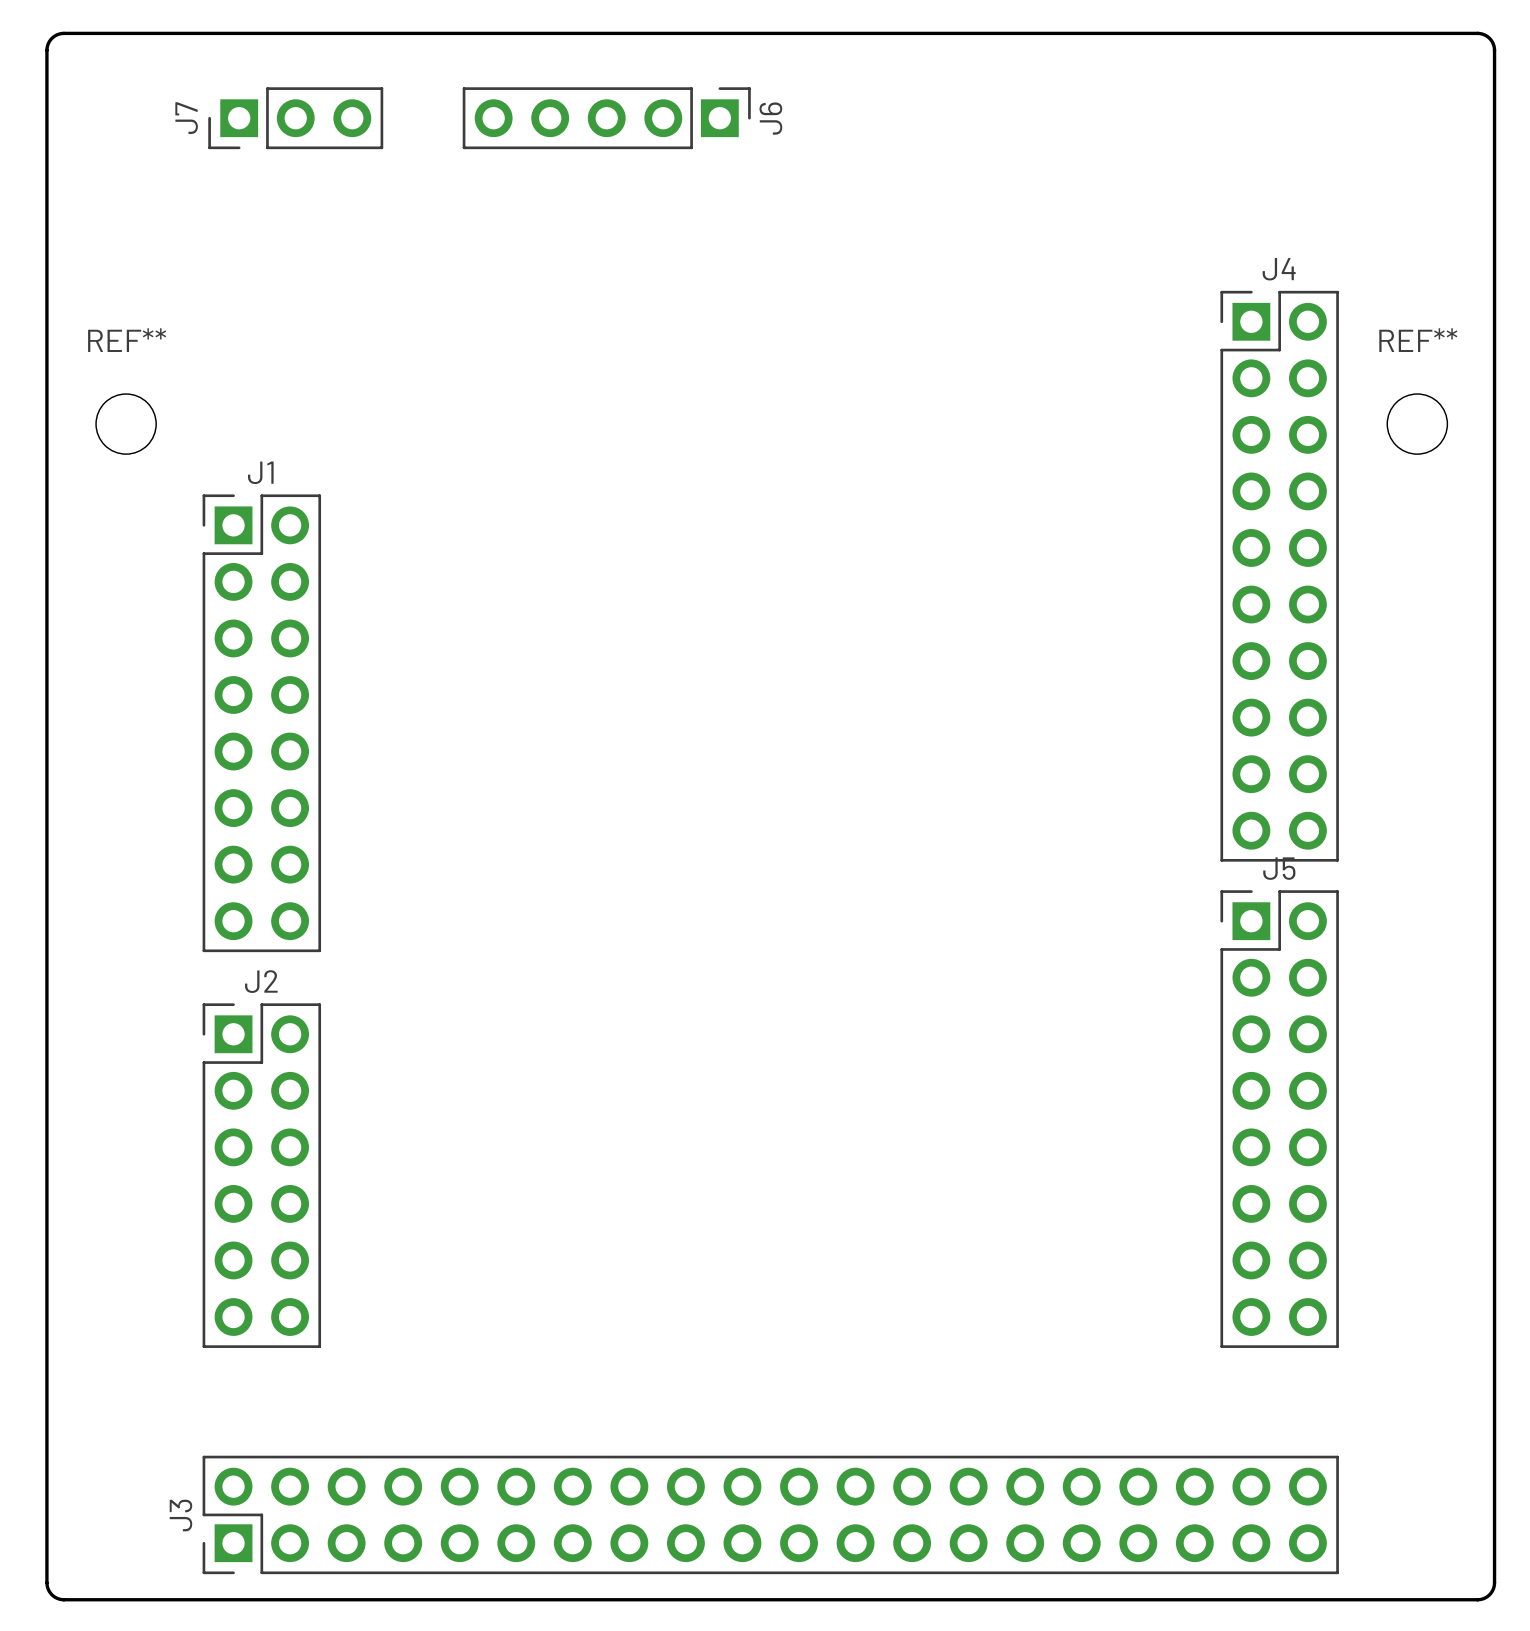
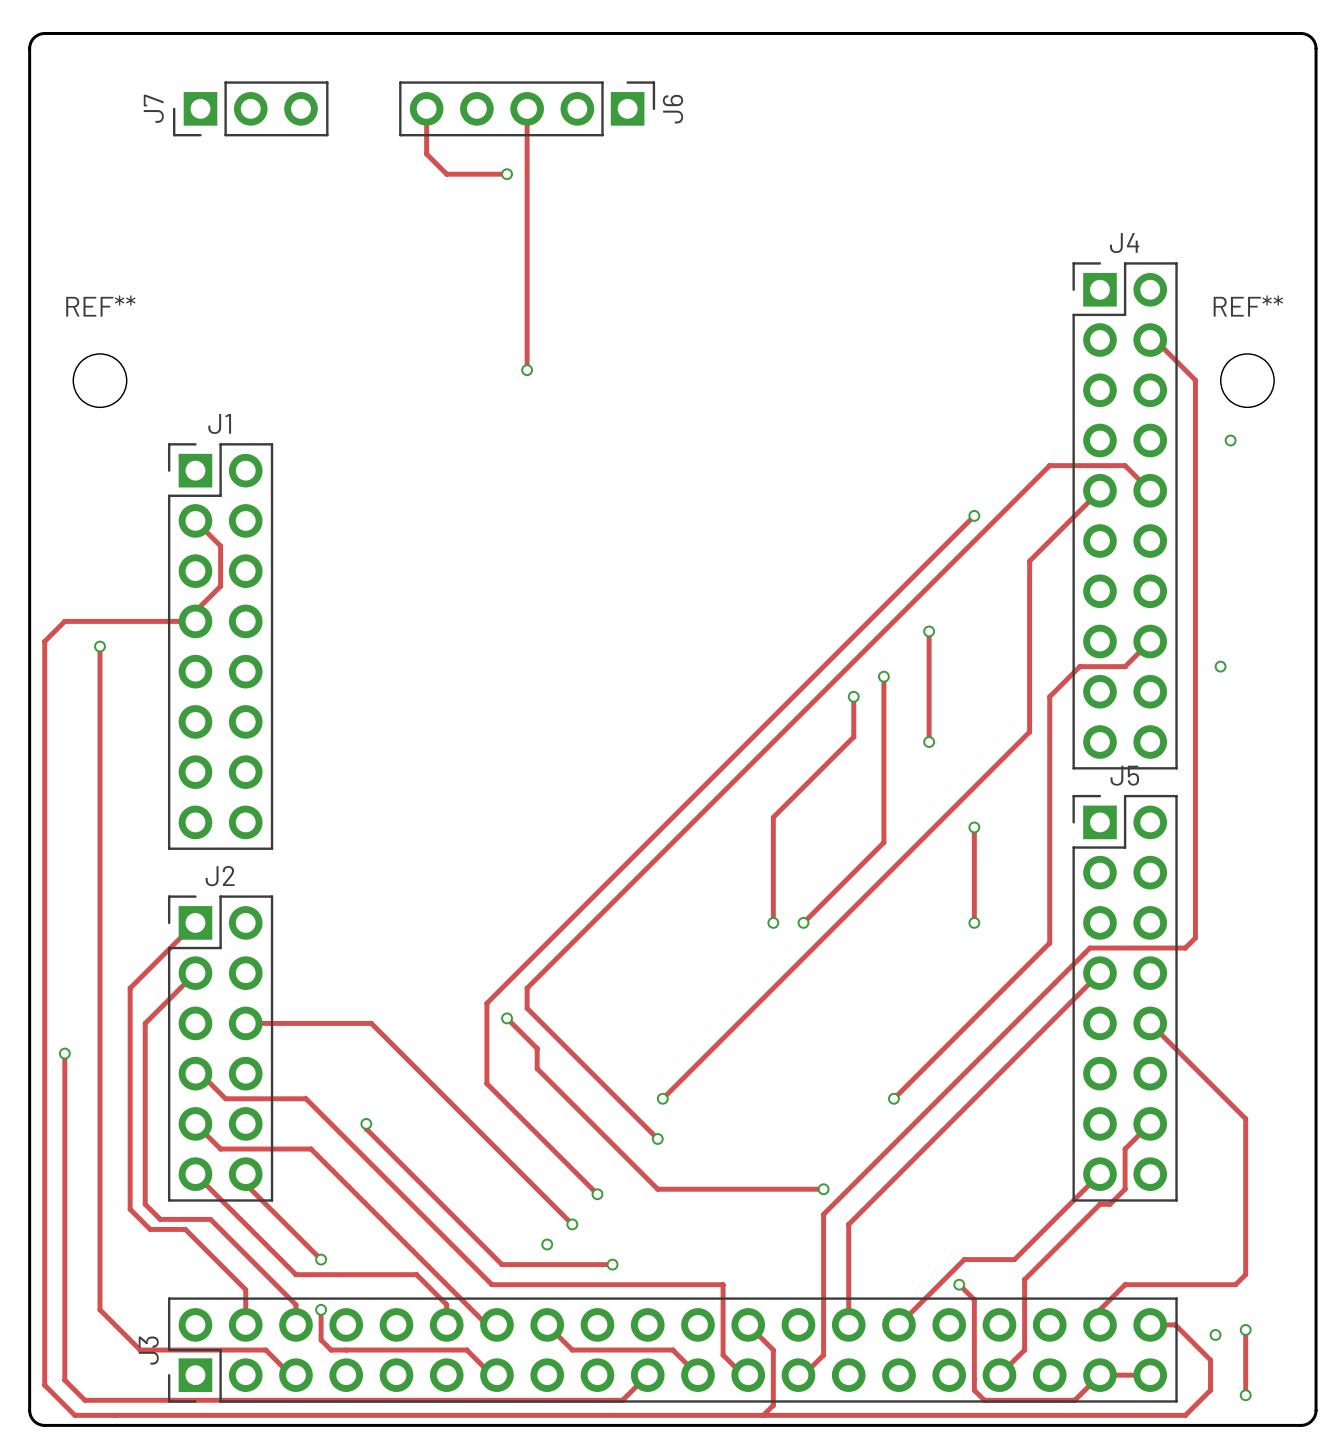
track: none -> (426, 108) (426, 154) (446, 174) (507, 174)
track: none -> (527, 108) (527, 370)
via: none -> (507, 174)
track: none -> (1150, 340) (1155, 340) (1195, 380) (1195, 937) (1185, 948) (1089, 948) (823, 1214) (823, 1355) (803, 1375) (798, 1375)
via: none -> (527, 370)
via: none -> (1230, 440)
track: none -> (1099, 490) (1029, 561) (1029, 731) (662, 1098)
track: none -> (1150, 490) (1125, 465) (1049, 465) (527, 988) (527, 1008) (657, 1138)
track: none -> (974, 515) (486, 1003) (486, 1083) (597, 1194)
via: none -> (974, 515)
track: none -> (195, 520) (220, 546) (220, 586) (195, 611) (195, 621) (64, 621) (44, 641) (44, 1385) (74, 1415) (1185, 1415) (1210, 1390) (1210, 1360) (1175, 1324) (1150, 1324)
track: none -> (929, 631) (929, 742)
via: none -> (929, 631)
track: none -> (1150, 641) (1125, 666) (1079, 666) (1049, 696) (1049, 943) (893, 1098)
track: none -> (99, 646) (99, 1309) (140, 1350) (265, 1350) (290, 1375) (295, 1375)
via: none -> (99, 646)
via: none -> (1220, 666)
track: none -> (883, 676) (883, 842) (803, 922)
via: none -> (883, 676)
track: none -> (853, 696) (853, 736) (773, 817) (773, 922)
via: none -> (853, 696)
via: none -> (929, 742)
track: none -> (974, 827) (974, 922)
via: none -> (974, 827)
track: none -> (195, 922) (130, 988) (130, 1209) (150, 1229) (185, 1229) (245, 1289) (245, 1324)
via: none -> (773, 922)
via: none -> (803, 922)
via: none -> (974, 922)
track: none -> (195, 973) (145, 1023) (145, 1204) (160, 1219) (210, 1219) (295, 1304) (295, 1324)
track: none -> (1099, 973) (848, 1224) (848, 1324)
track: none -> (507, 1018) (537, 1048) (537, 1068) (657, 1189) (823, 1189)
via: none -> (507, 1018)
track: none -> (245, 1023) (371, 1023) (572, 1224)
track: none -> (1150, 1023) (1245, 1118) (1245, 1274) (1235, 1284) (1125, 1284) (1099, 1309) (1099, 1324)
track: none -> (64, 1053) (64, 1380) (84, 1400) (622, 1400) (647, 1375)
via: none -> (64, 1053)
track: none -> (195, 1073) (200, 1073) (225, 1098) (306, 1098) (491, 1284) (723, 1284) (723, 1355) (743, 1375) (748, 1375)
via: none -> (662, 1098)
via: none -> (893, 1098)
track: none -> (195, 1123) (220, 1149) (311, 1149) (486, 1324) (496, 1324)
track: none -> (366, 1123) (366, 1128) (501, 1264) (612, 1264)
via: none -> (366, 1123)
track: none -> (1150, 1123) (1125, 1149) (1125, 1189) (1110, 1204) (1099, 1204) (1024, 1279) (1024, 1350) (999, 1375)
via: none -> (657, 1138)
track: none -> (195, 1174) (295, 1274) (416, 1274) (446, 1304) (446, 1324)
track: none -> (245, 1174) (245, 1184) (321, 1259)
track: none -> (1099, 1174) (1014, 1259) (964, 1259) (898, 1324)
via: none -> (823, 1189)
via: none -> (597, 1194)
via: none -> (572, 1224)
via: none -> (547, 1244)
via: none -> (321, 1259)
via: none -> (612, 1264)
track: none -> (959, 1284) (974, 1299) (974, 1390) (984, 1400) (1074, 1400) (1099, 1375) (1150, 1375)
via: none -> (959, 1284)
track: none -> (321, 1309) (321, 1339) (331, 1350) (466, 1350) (491, 1375) (496, 1375)
via: none -> (321, 1309)
track: none -> (547, 1324) (572, 1350) (672, 1350) (697, 1375)
track: none -> (748, 1324) (773, 1350) (773, 1405) (763, 1415)
track: none -> (1245, 1329) (1245, 1395)
via: none -> (1245, 1329)
via: none -> (1215, 1334)
via: none -> (1245, 1395)

